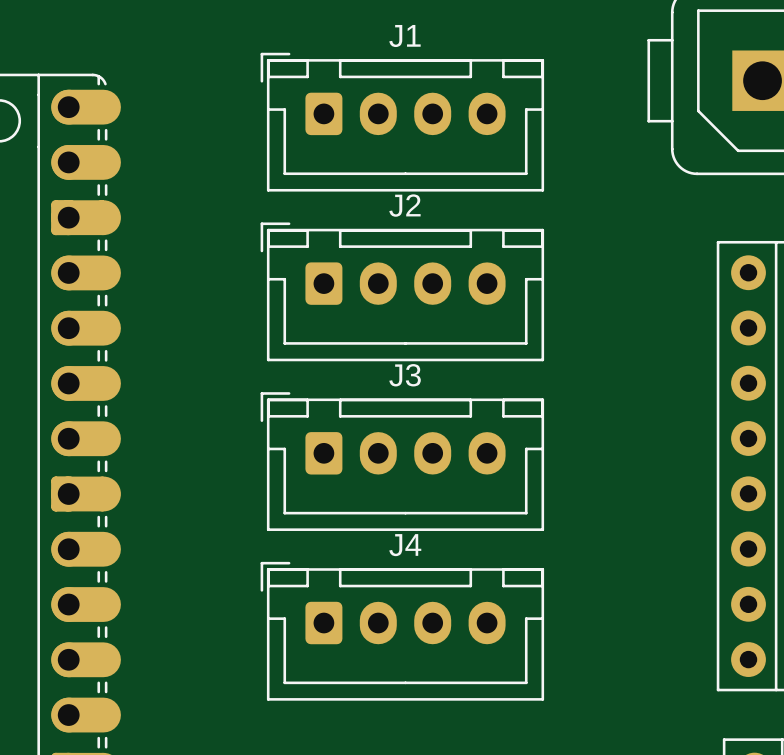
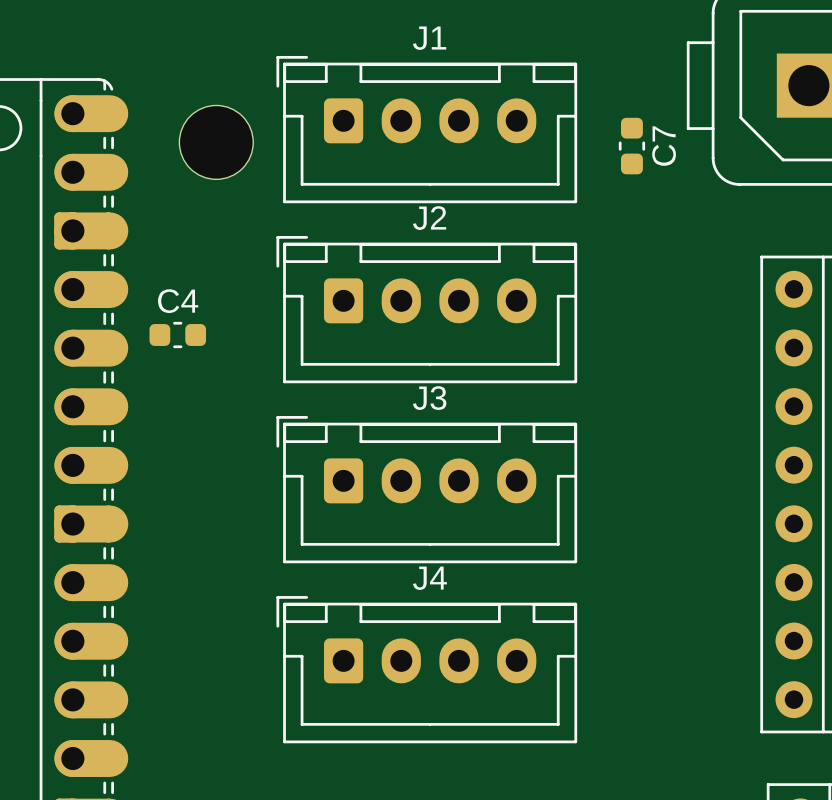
part: none -> (216, 142)
C7: none -> (631, 146)
C4: none -> (177, 335)

